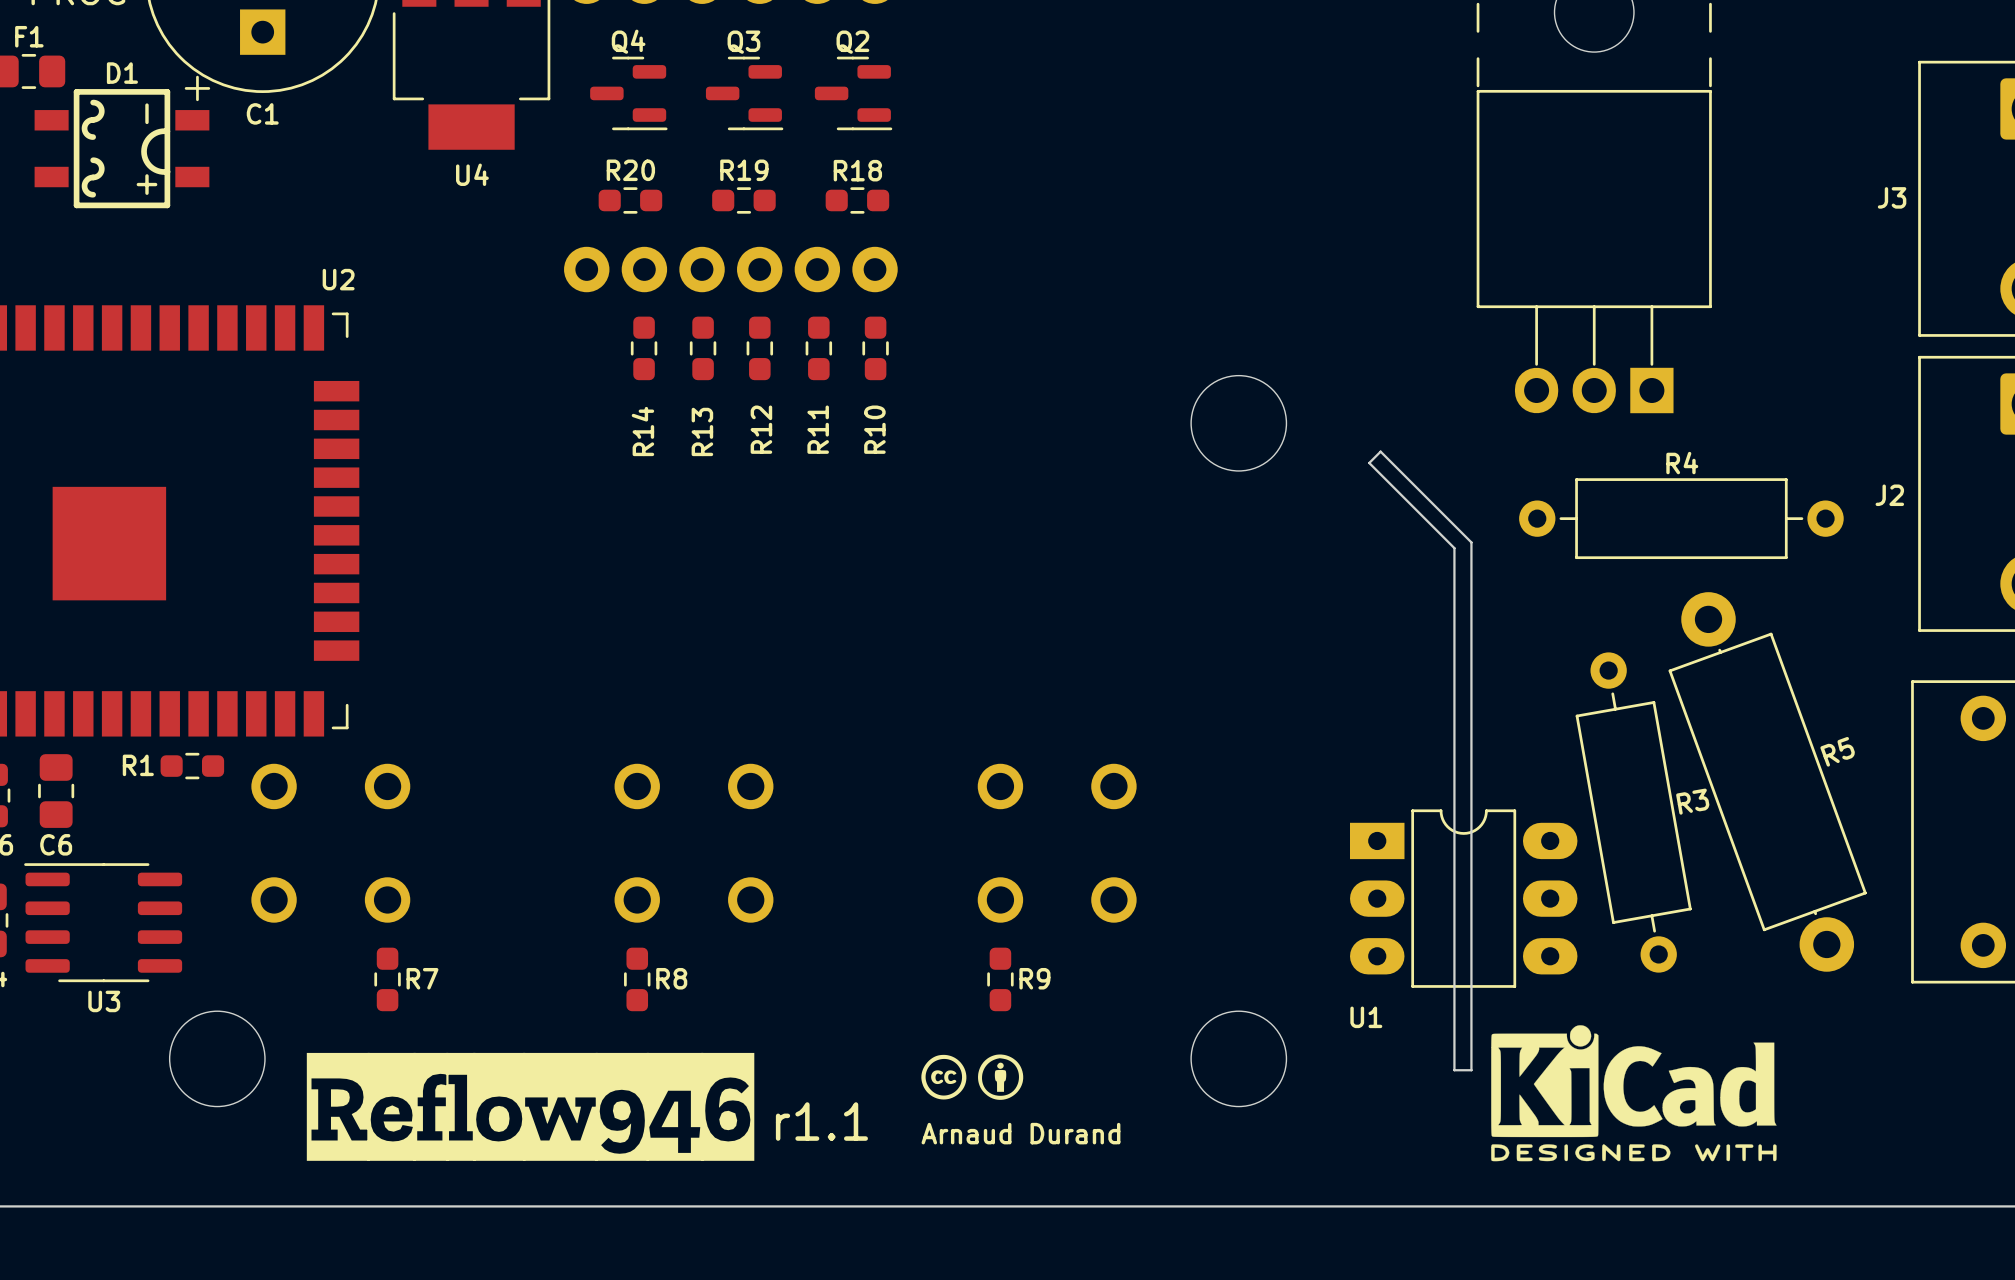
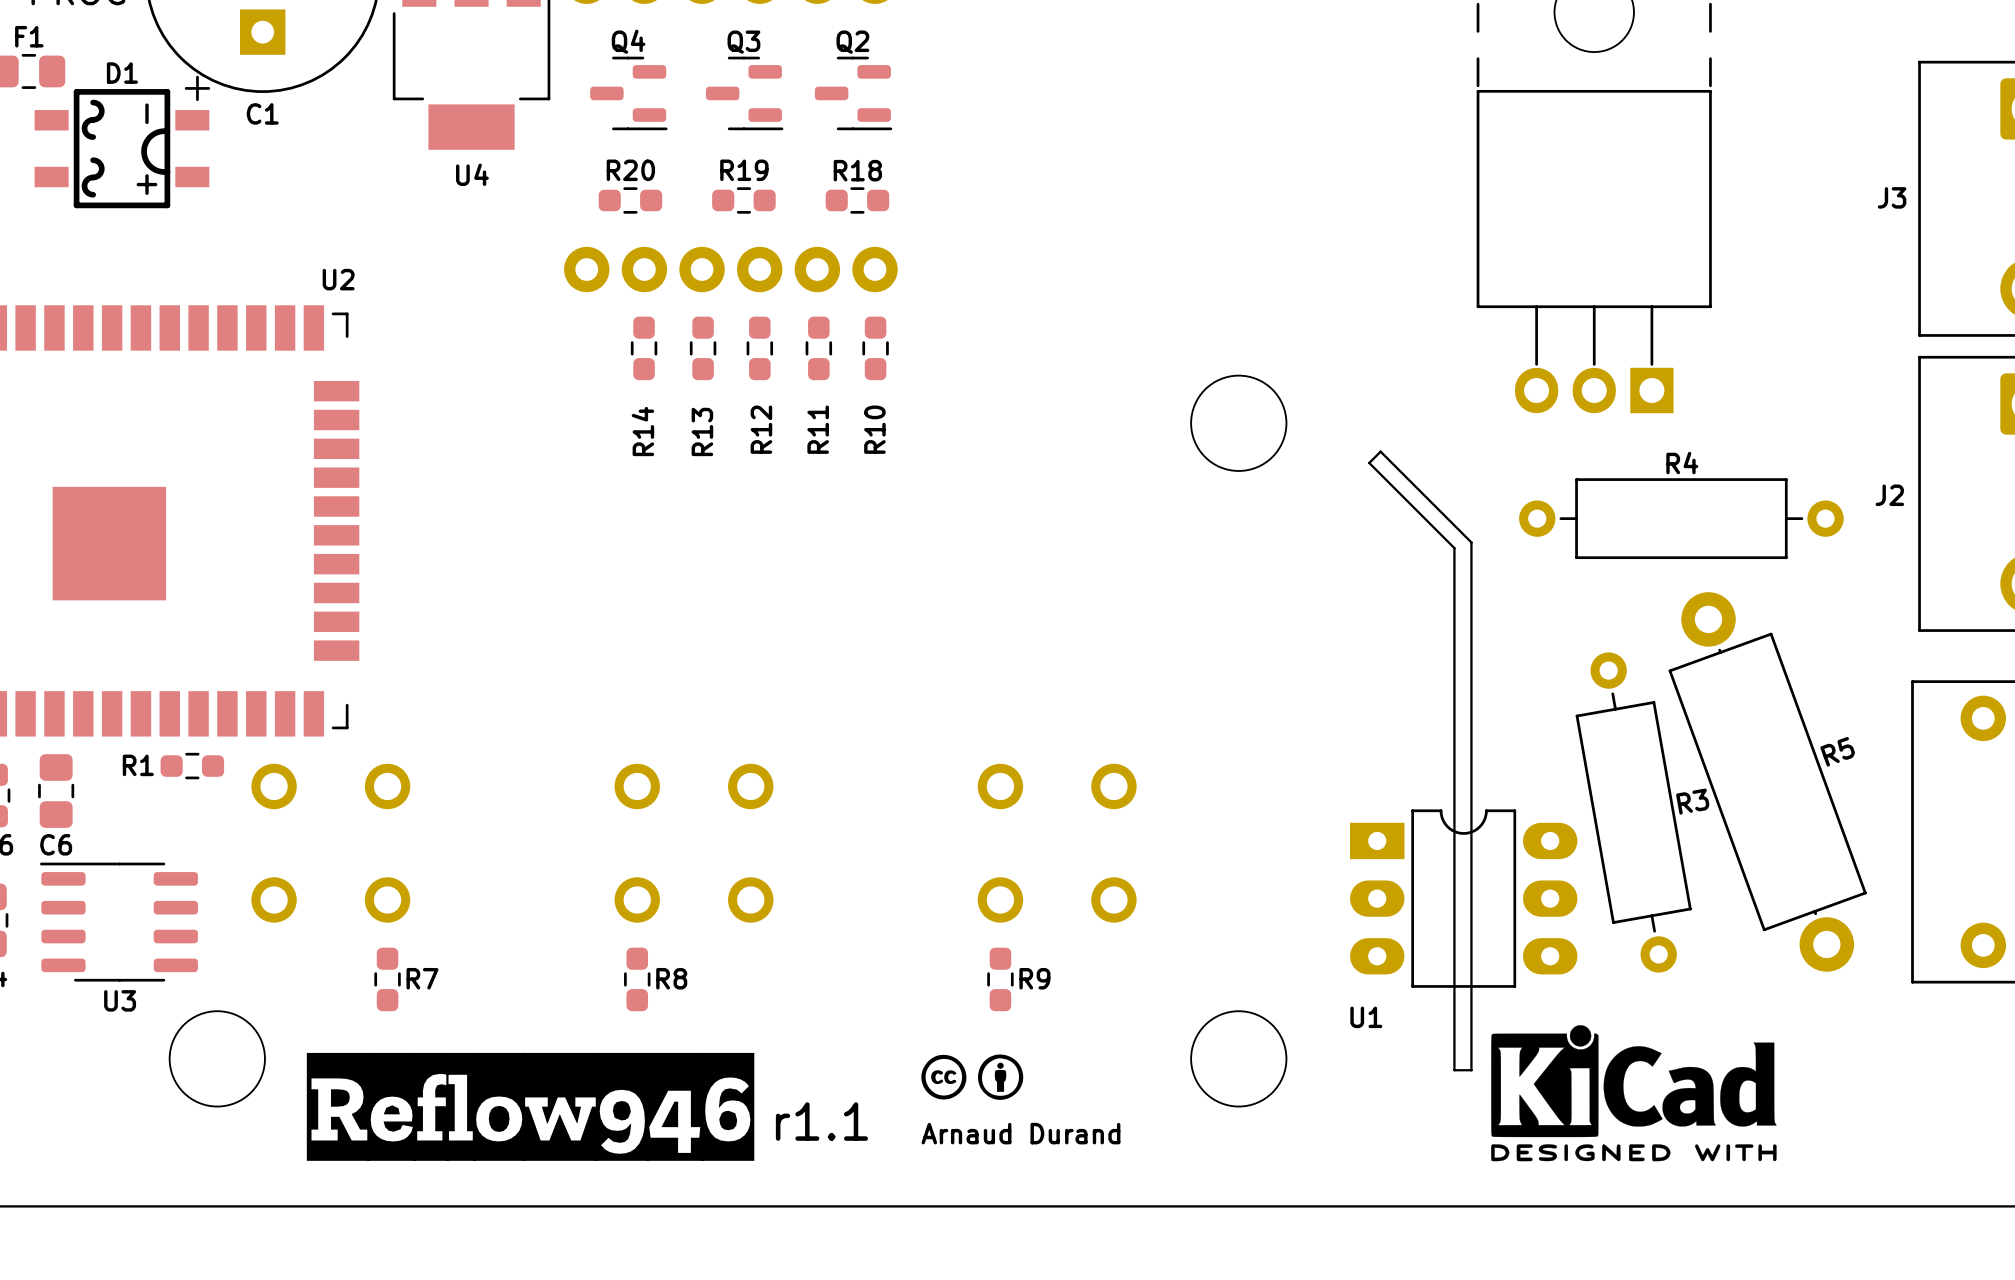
U3 position: (103, 922) -> (118, 922)

